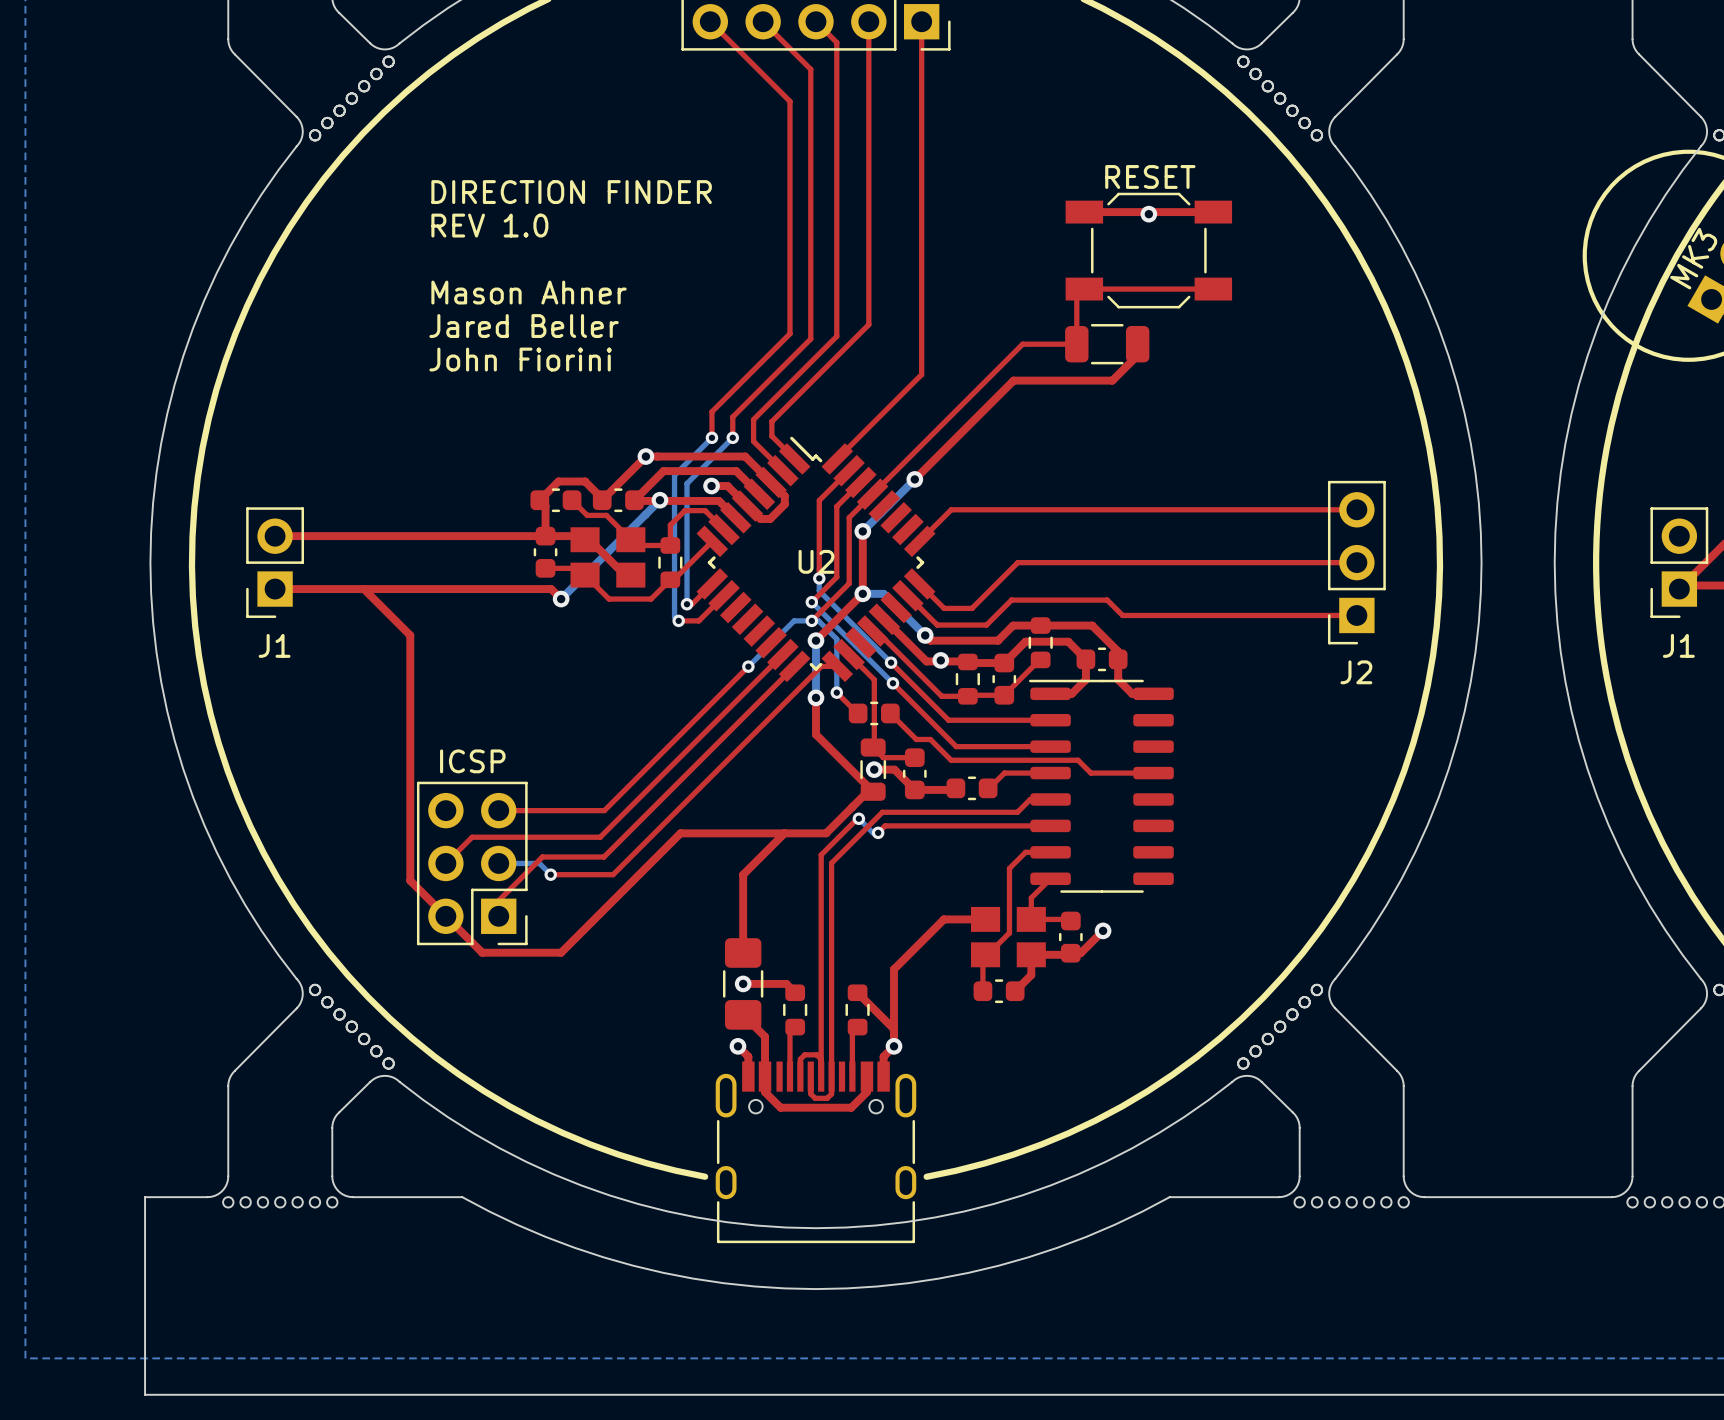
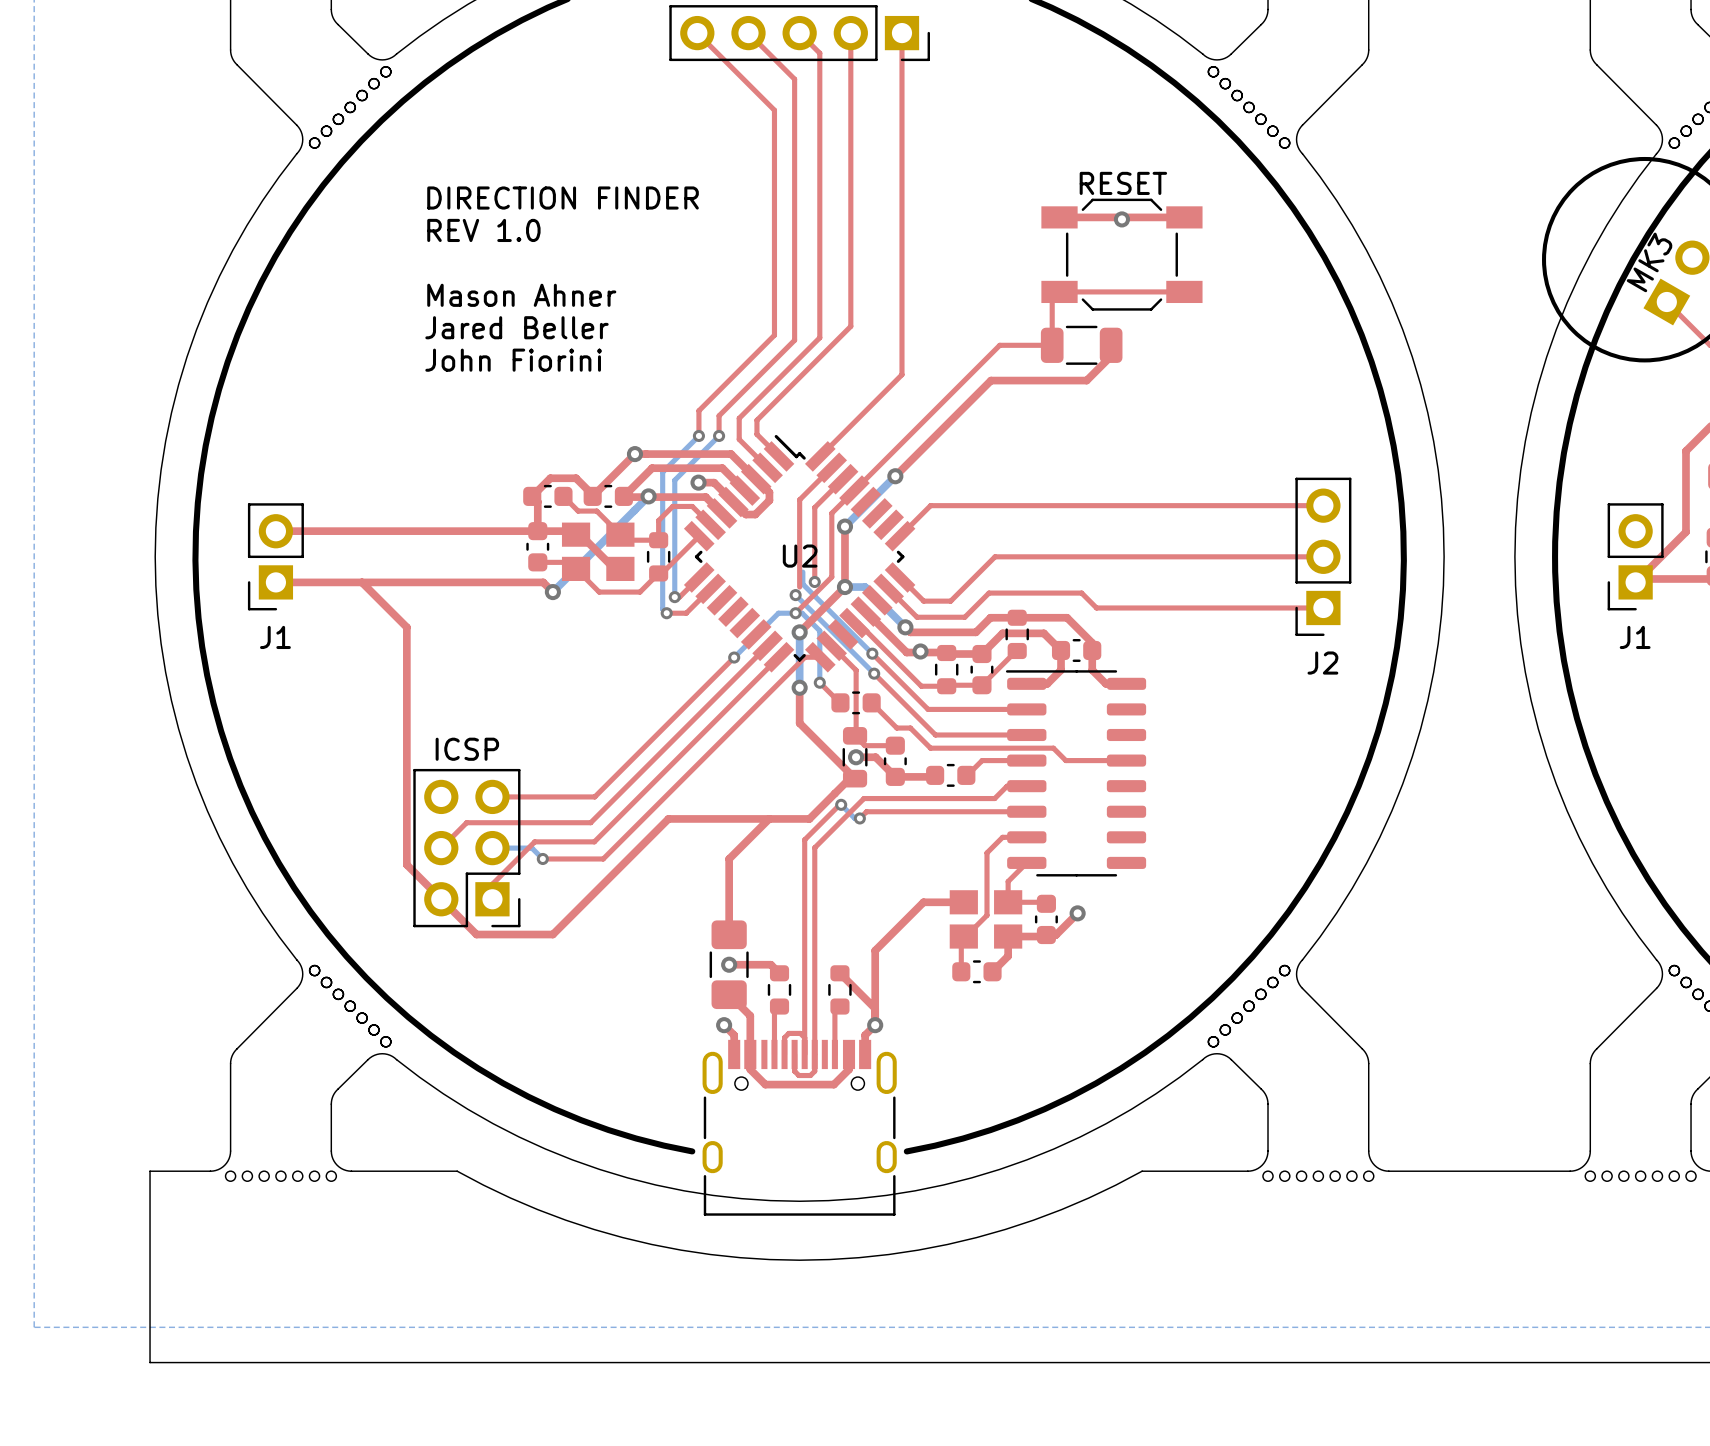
top track: (819, 500) (819, 578) -> (802, 496) (799, 499) (799, 587)
top track: (836, 506) (836, 577) (811, 602) -> (819, 502) (814, 507) (814, 582)
via position: (819, 578) -> (814, 582)

